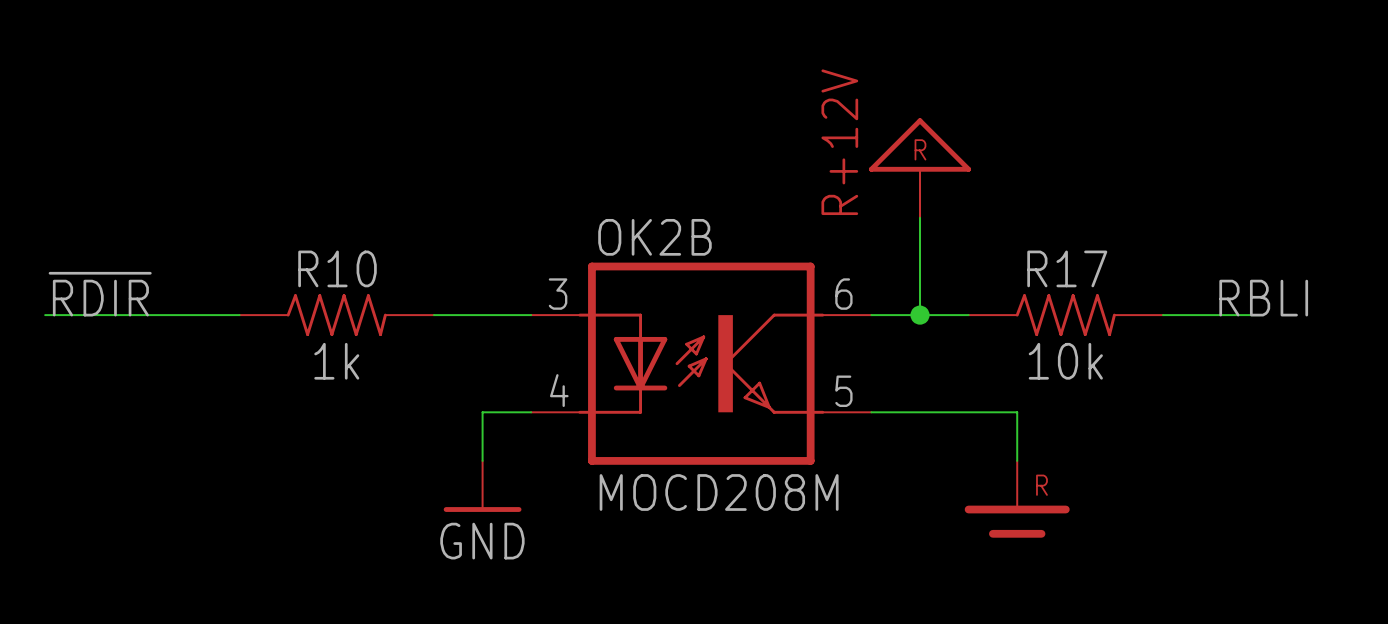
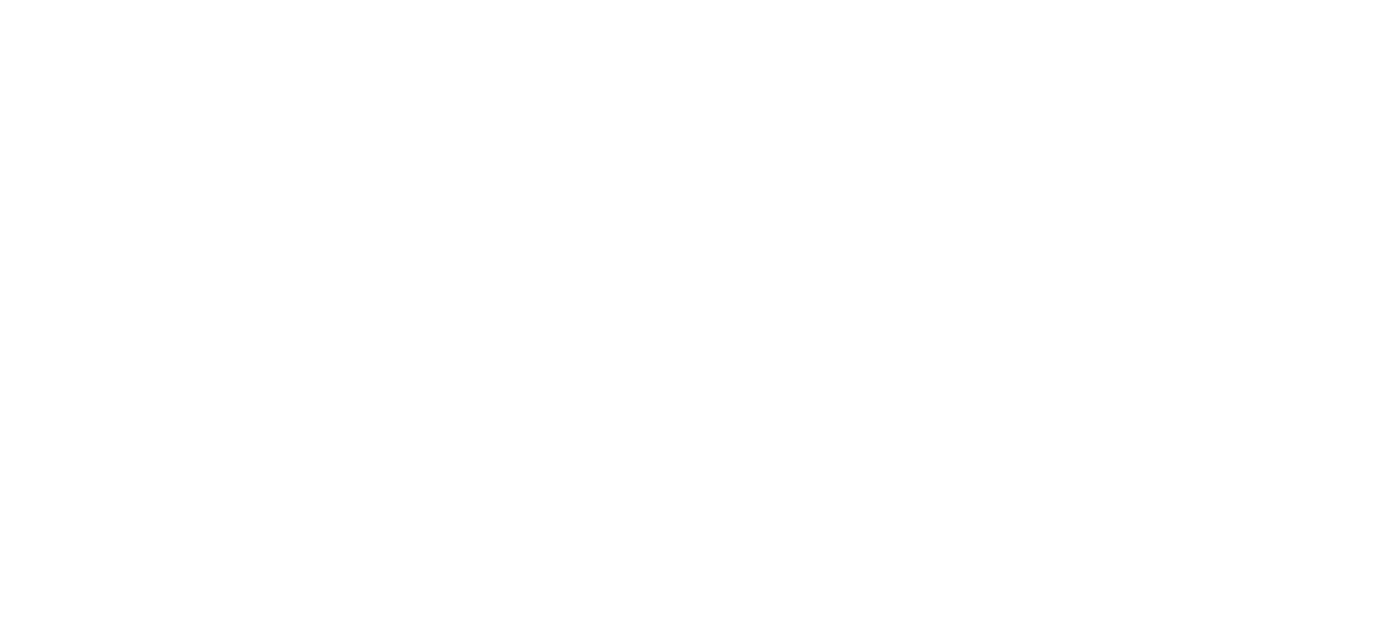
power symbol: R+12V (920, 168) -> none
wire: (920, 217) (920, 315) -> none
label: ~{RDIR} (100, 294) -> none
label: RBLI (1263, 298) -> none
wire: (45, 315) (239, 315) -> none
R10: 1k (336, 315) -> none
wire: (433, 315) (531, 315) -> none
wire: (871, 315) (968, 315) -> none
junction: (920, 315) -> none
R17: 10k (1065, 315) -> none
wire: (1163, 315) (1260, 315) -> none
OK2B: MOCD208M (701, 363) -> none
wire: (531, 412) (482, 412) (482, 460) -> none
wire: (871, 412) (1017, 412) (1017, 460) -> none
power symbol: GND (482, 486) -> none
power symbol: (1017, 499) -> none

